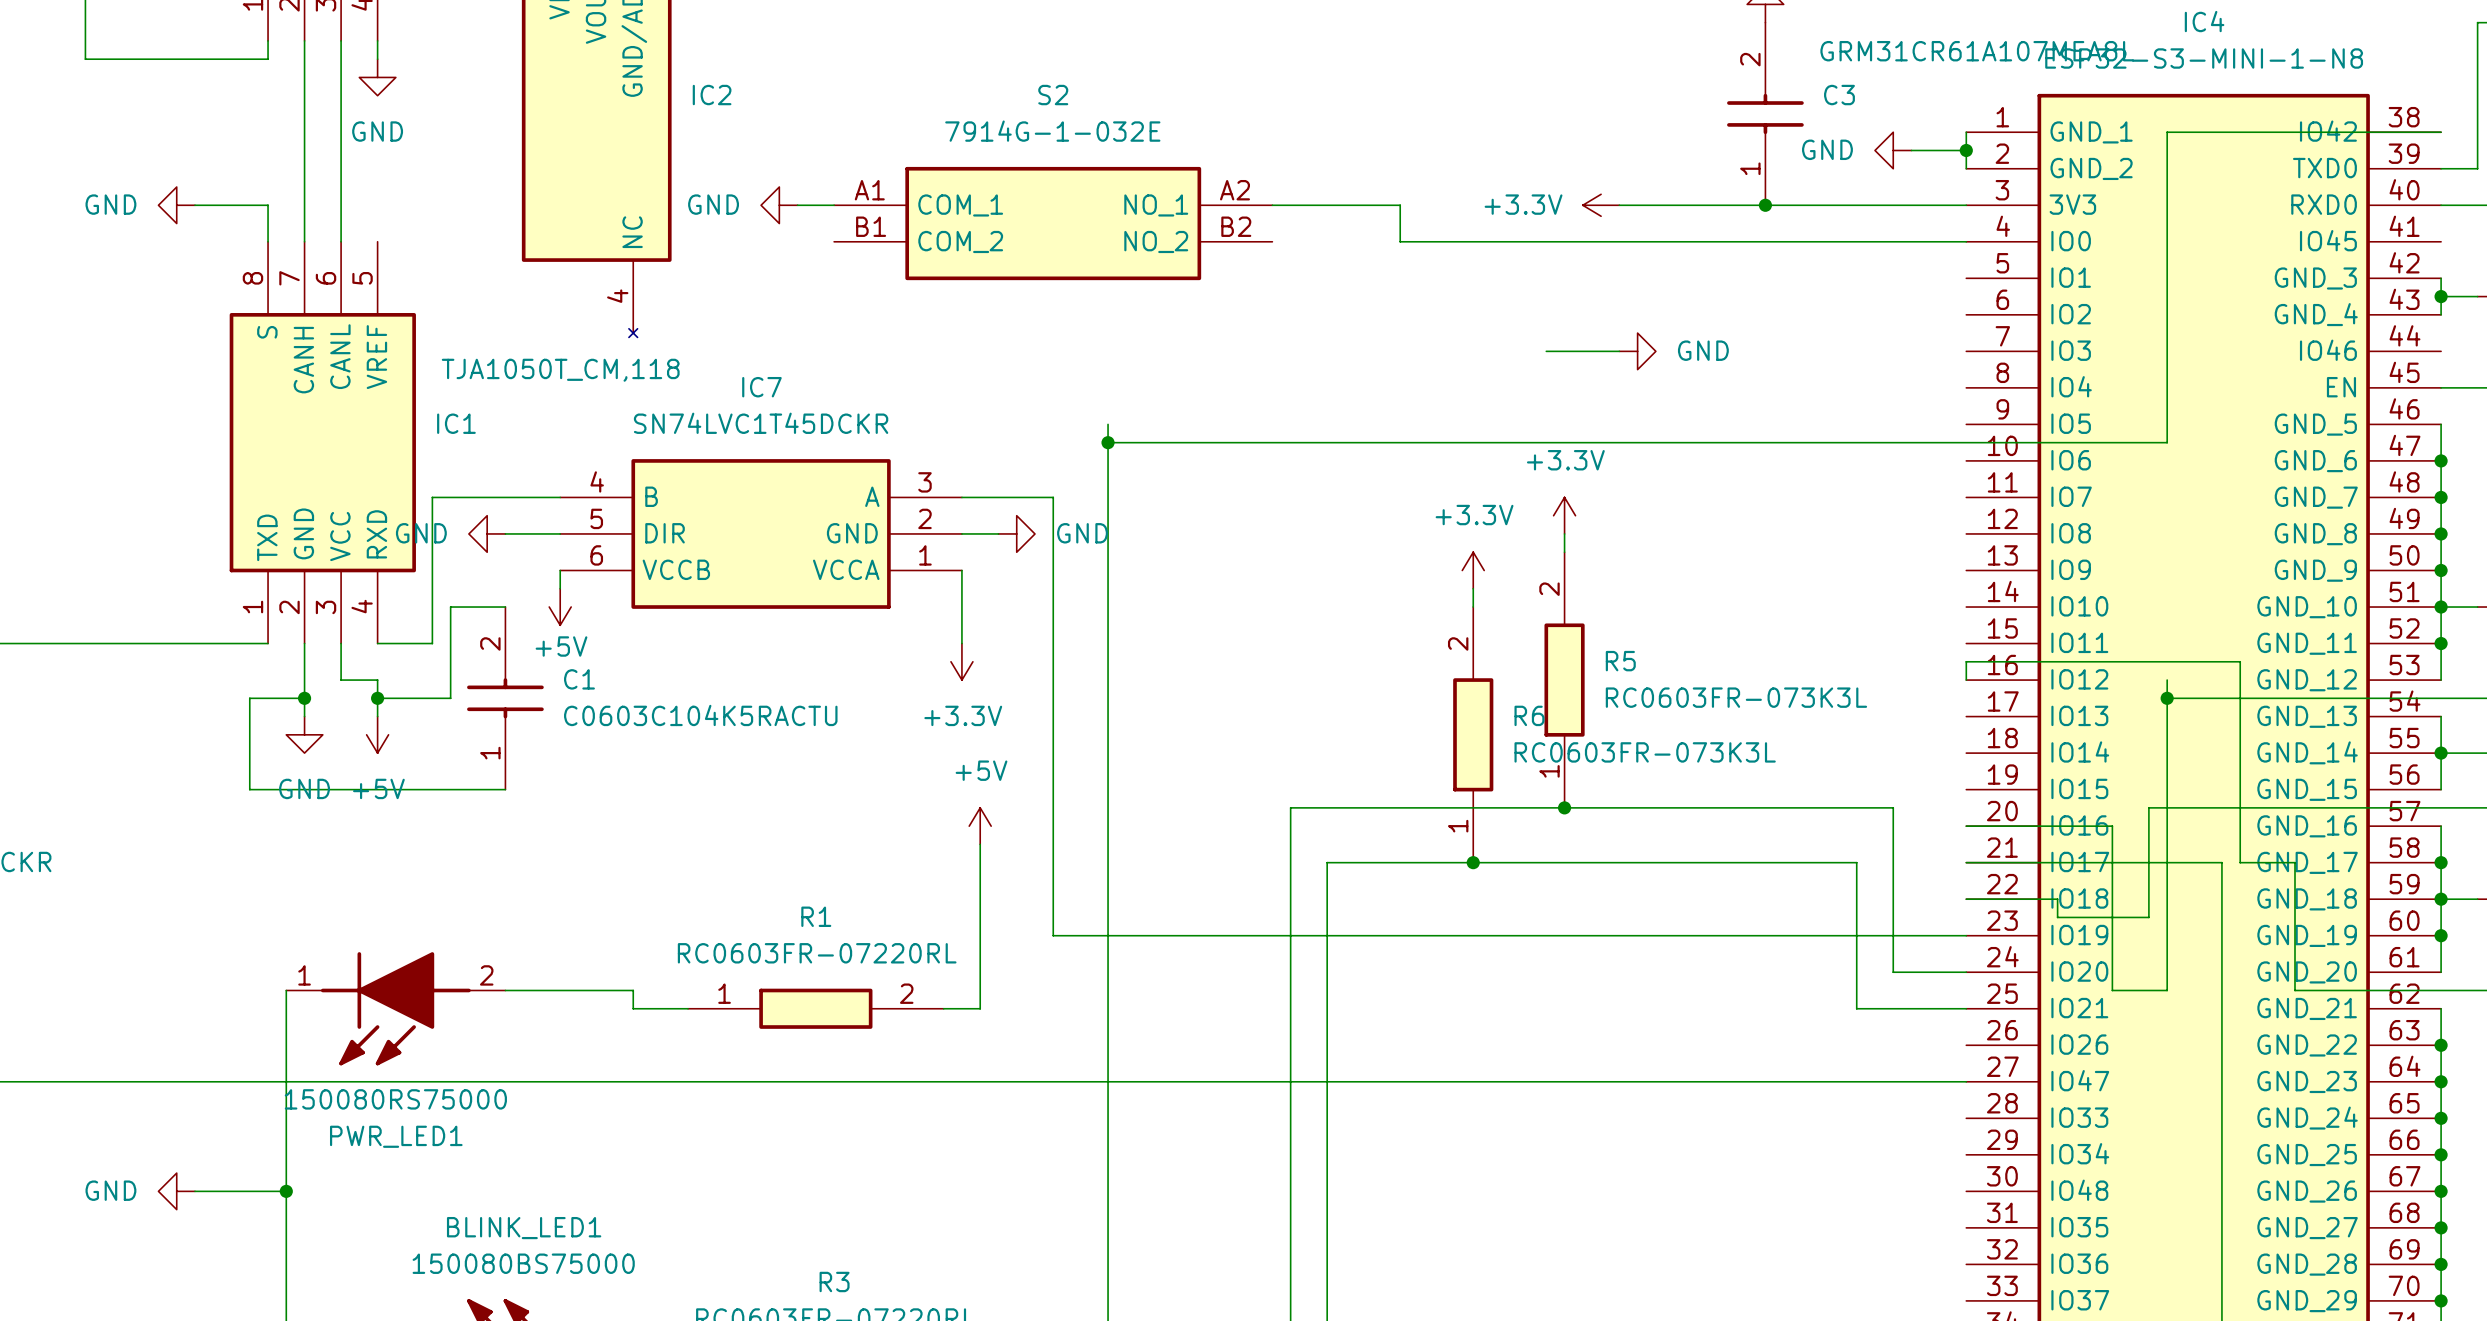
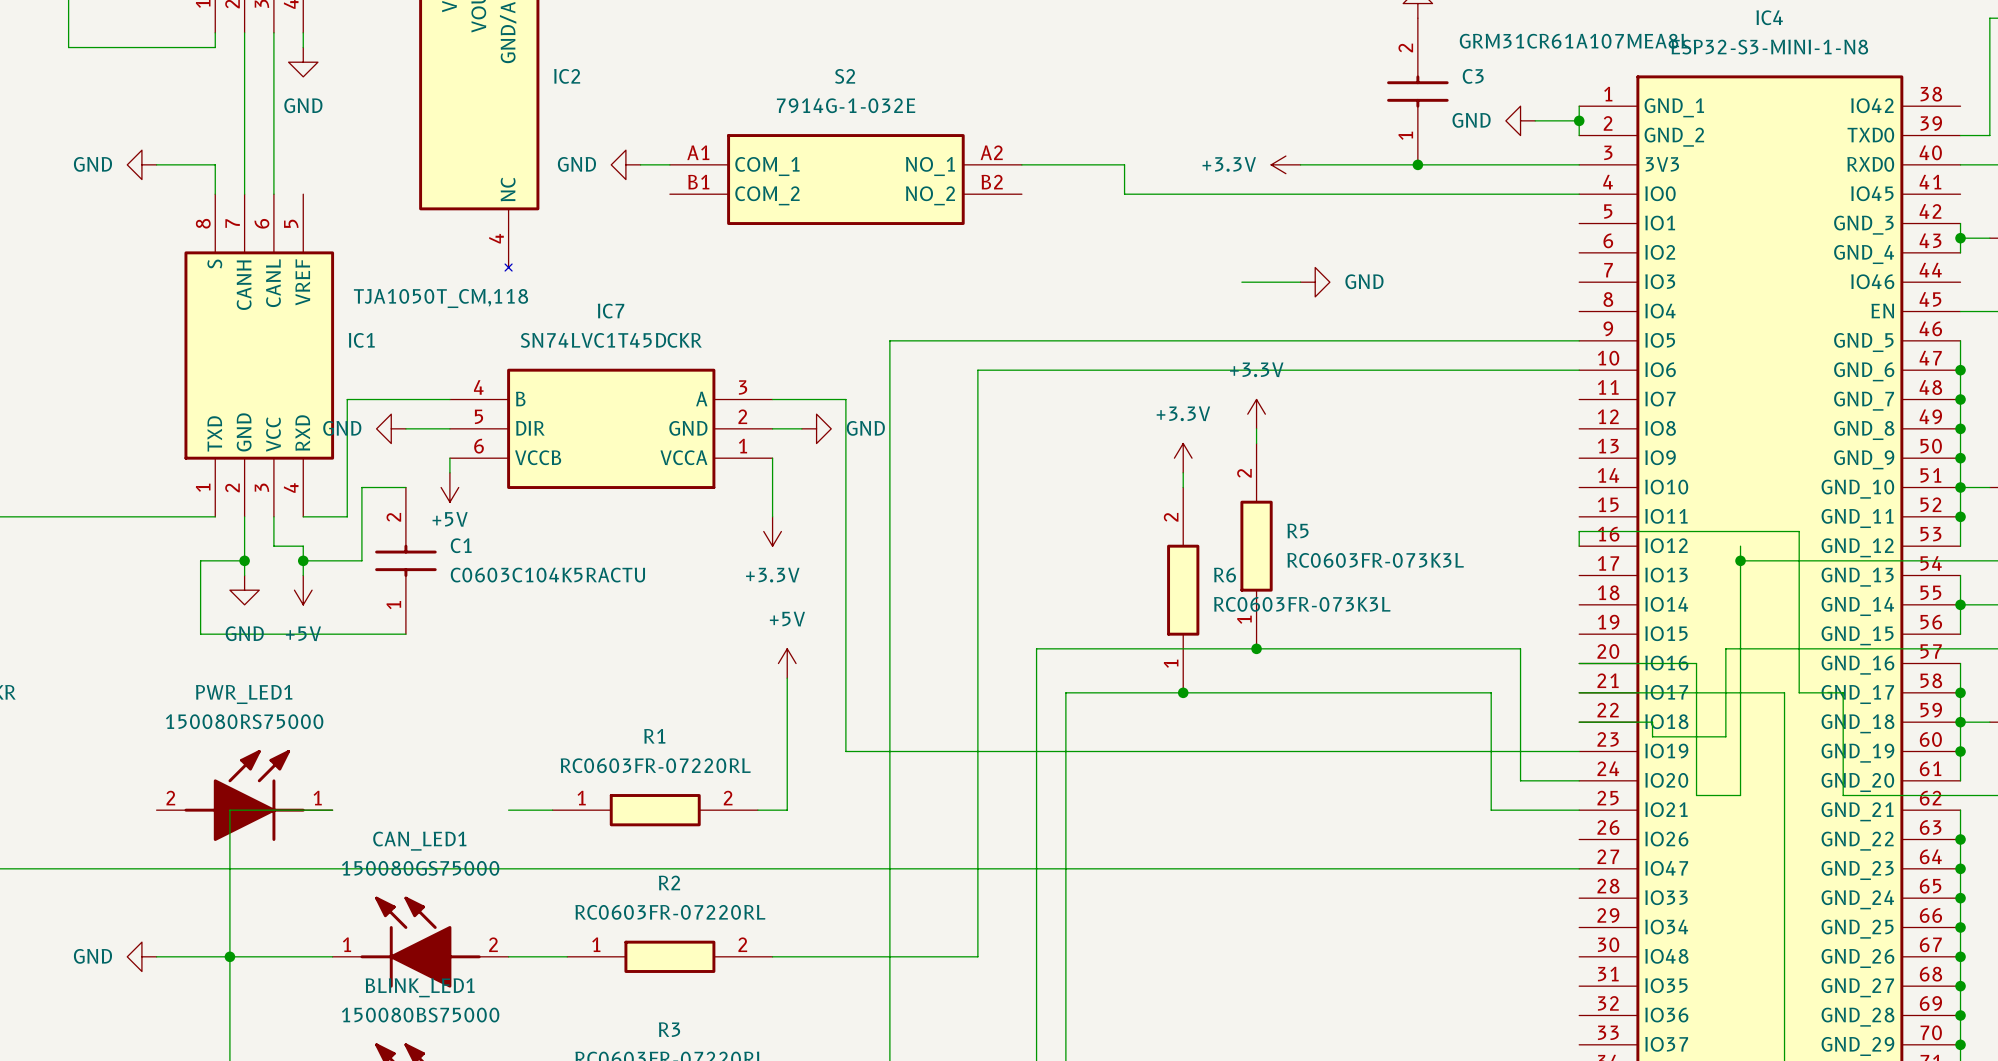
wire: (2441, 132) (2167, 132) (2167, 442) (1108, 442) -> none
wire: none -> (889, 340) (1579, 340)
junction: (1108, 442) -> none
wire: none -> (1579, 370) (977, 370) (977, 956) (772, 956)
wire: (505, 990) (633, 990) (633, 1008) -> none
PWR_LED1 rotation: 0° (395, 1008) -> 180° (244, 795)
CAN_LED1: none -> 150080GS75000 (420, 942)
wire: none -> (229, 956) (332, 956)
wire: none -> (508, 956) (567, 956)
R2: none -> RC0603FR-07220RL (669, 956)

